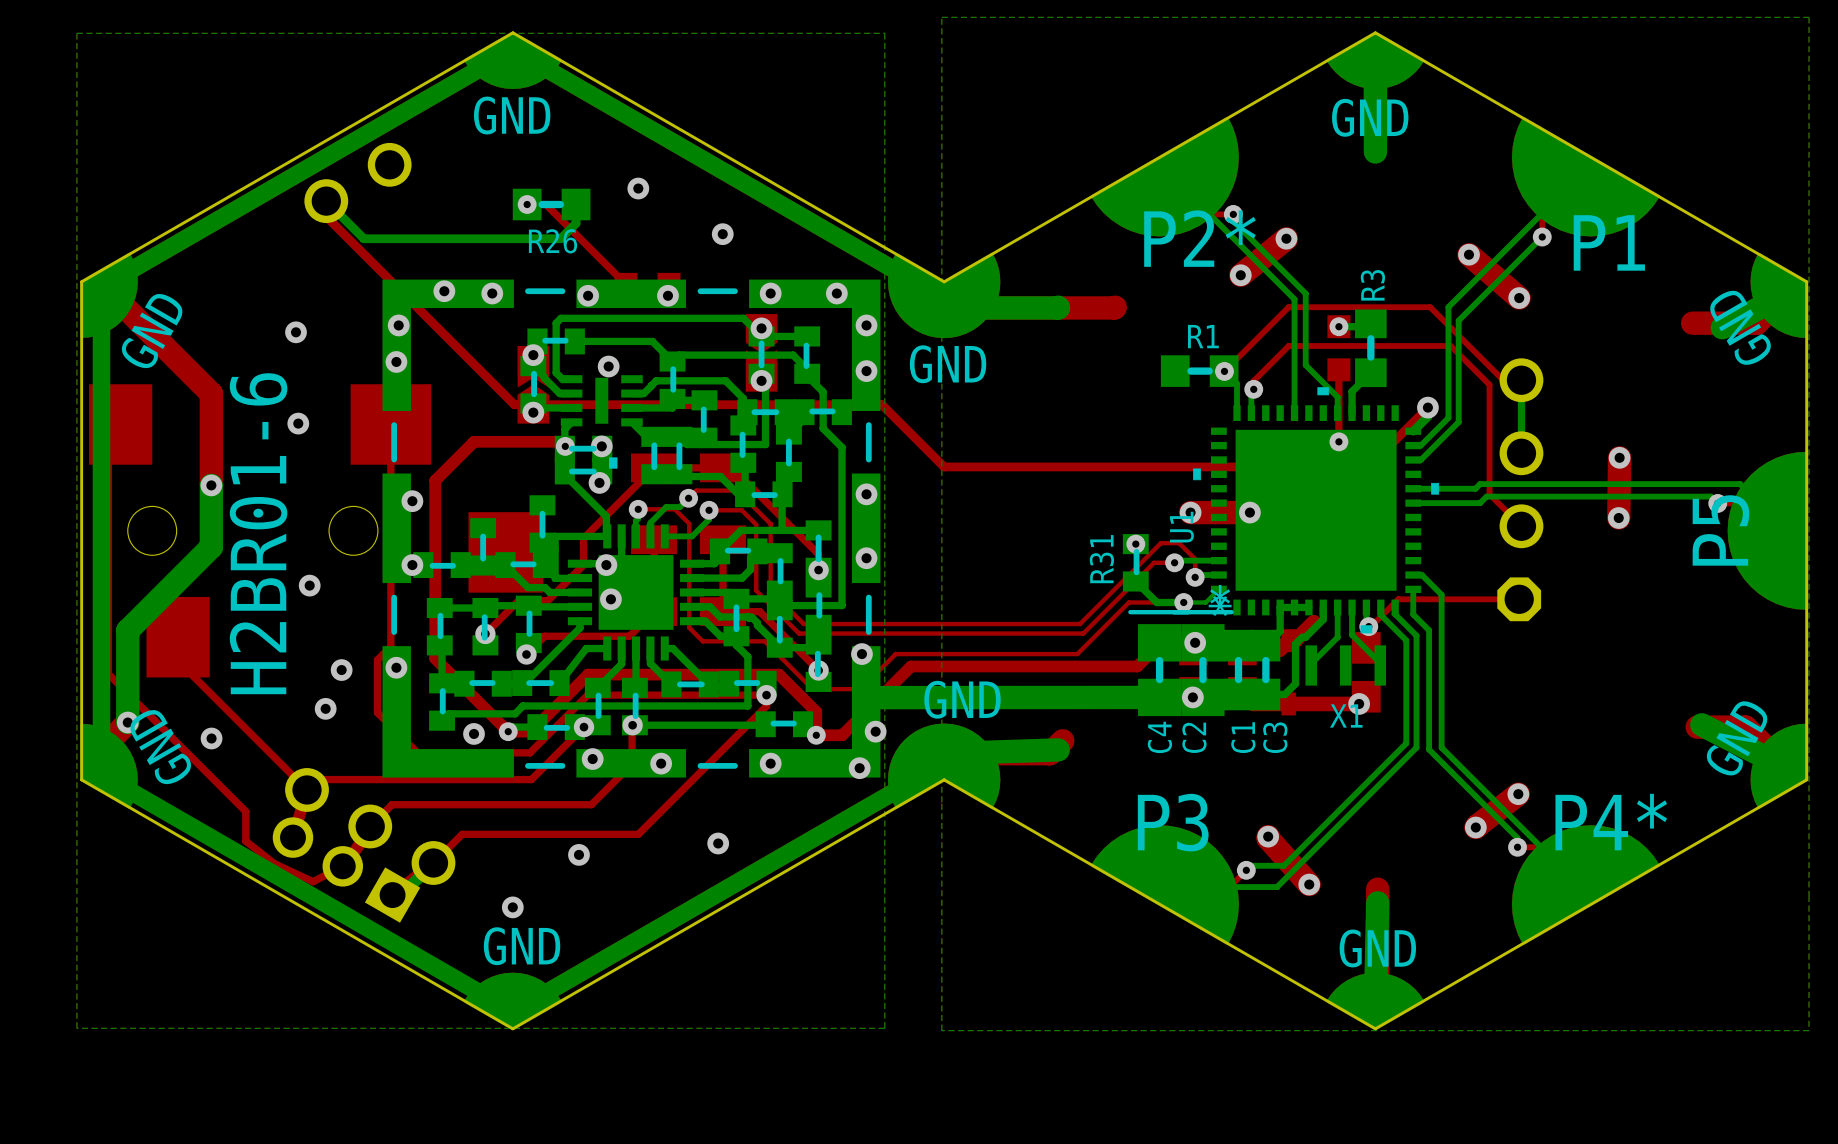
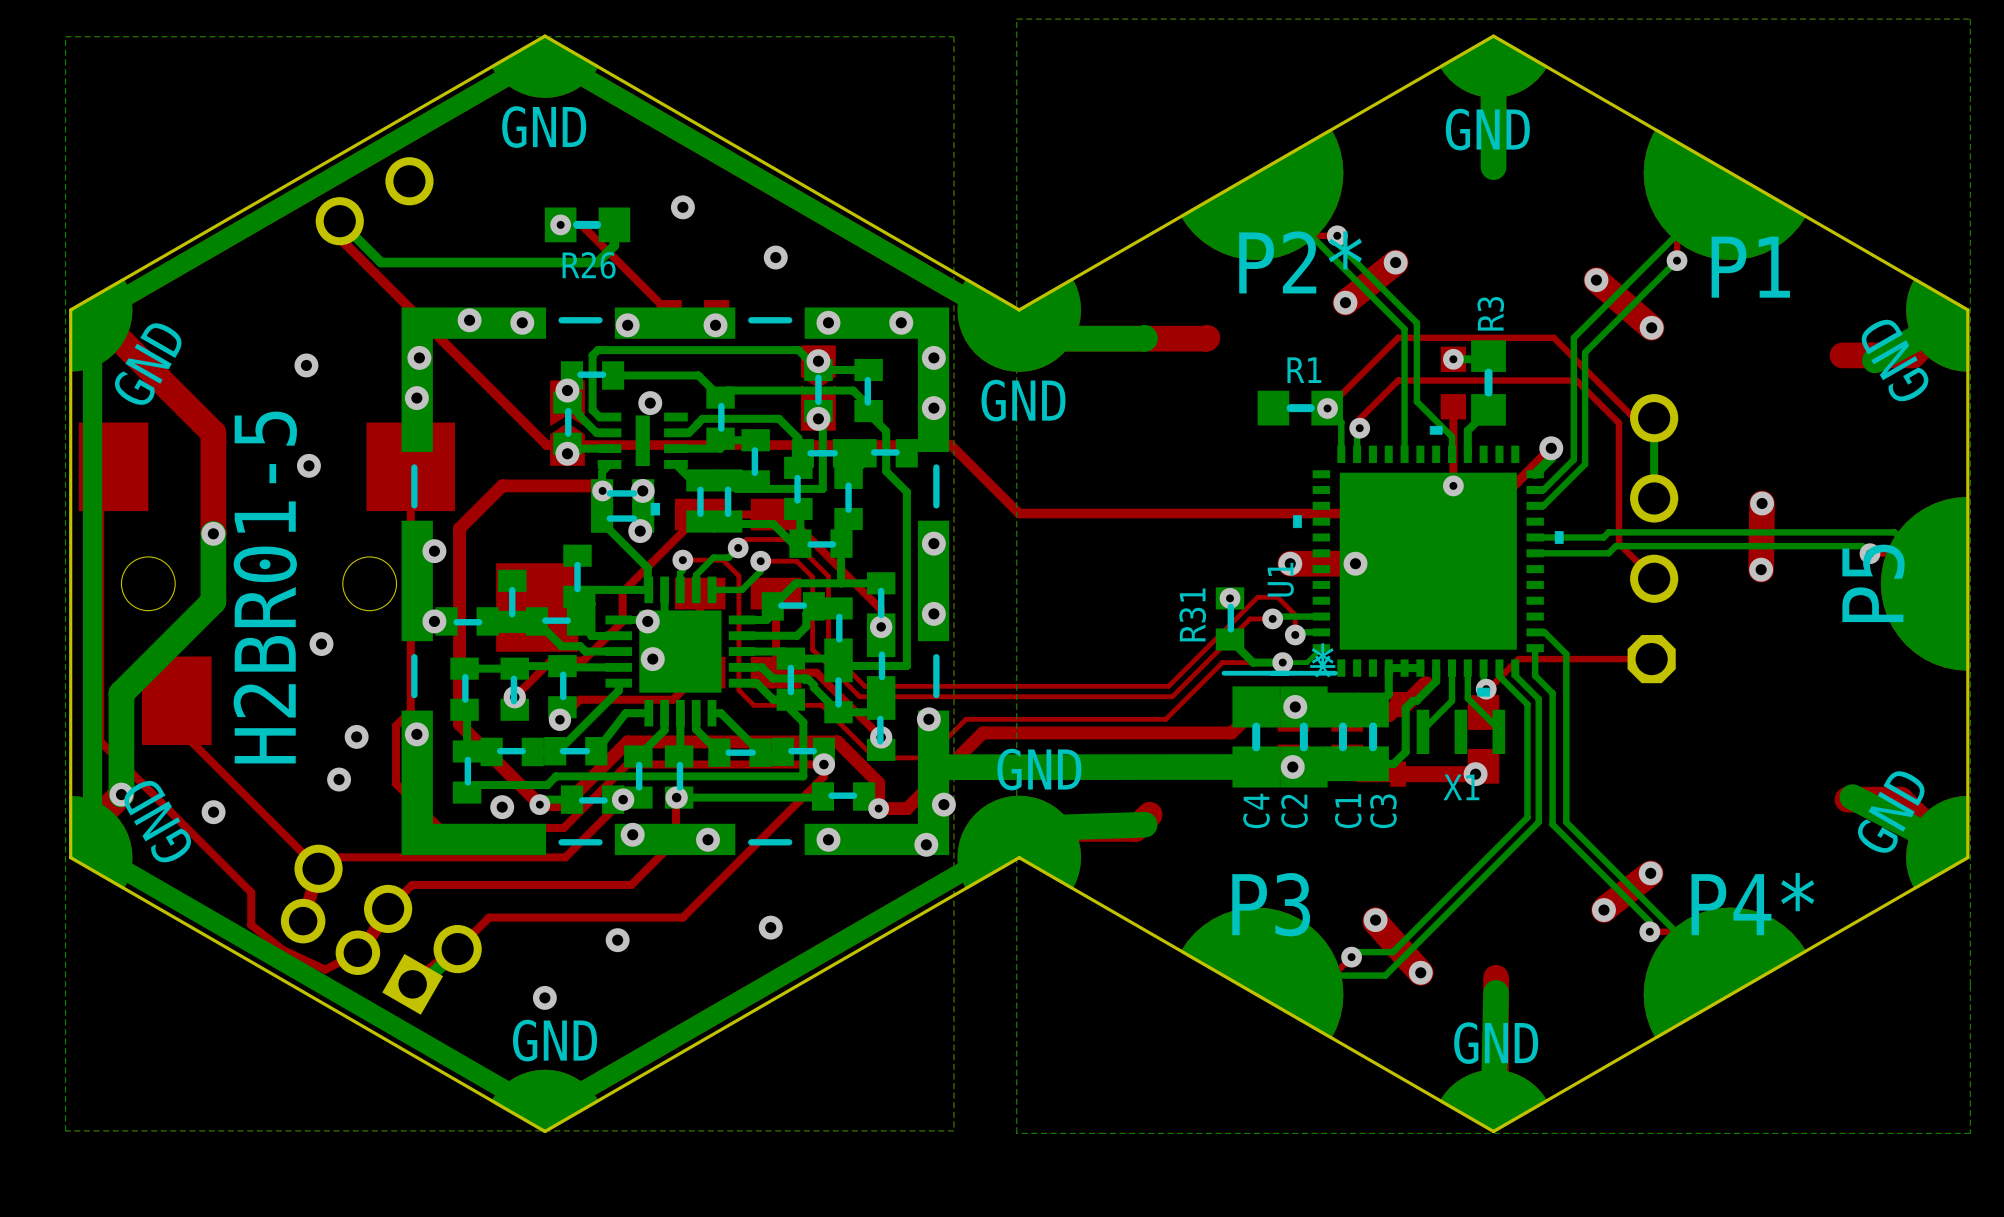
text: H2BR01-6 (258, 533) -> H2BR01-5 (265, 587)

